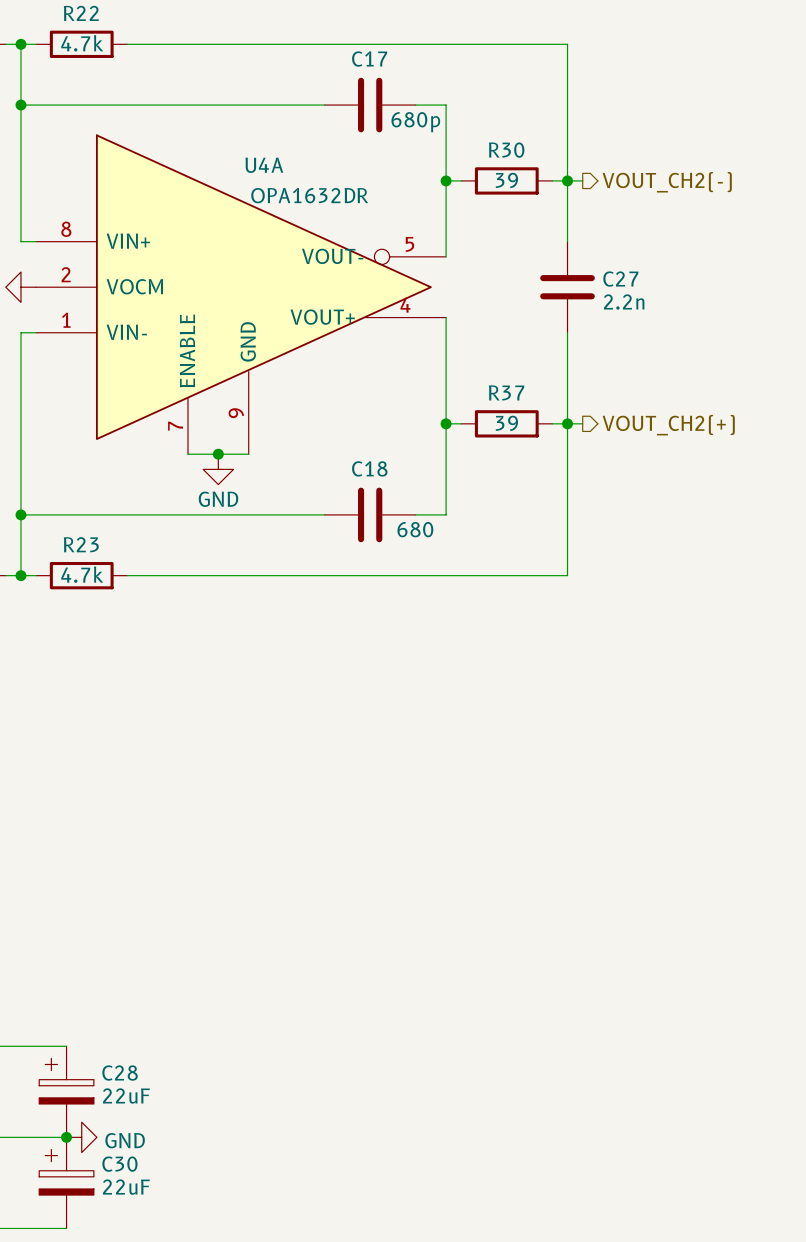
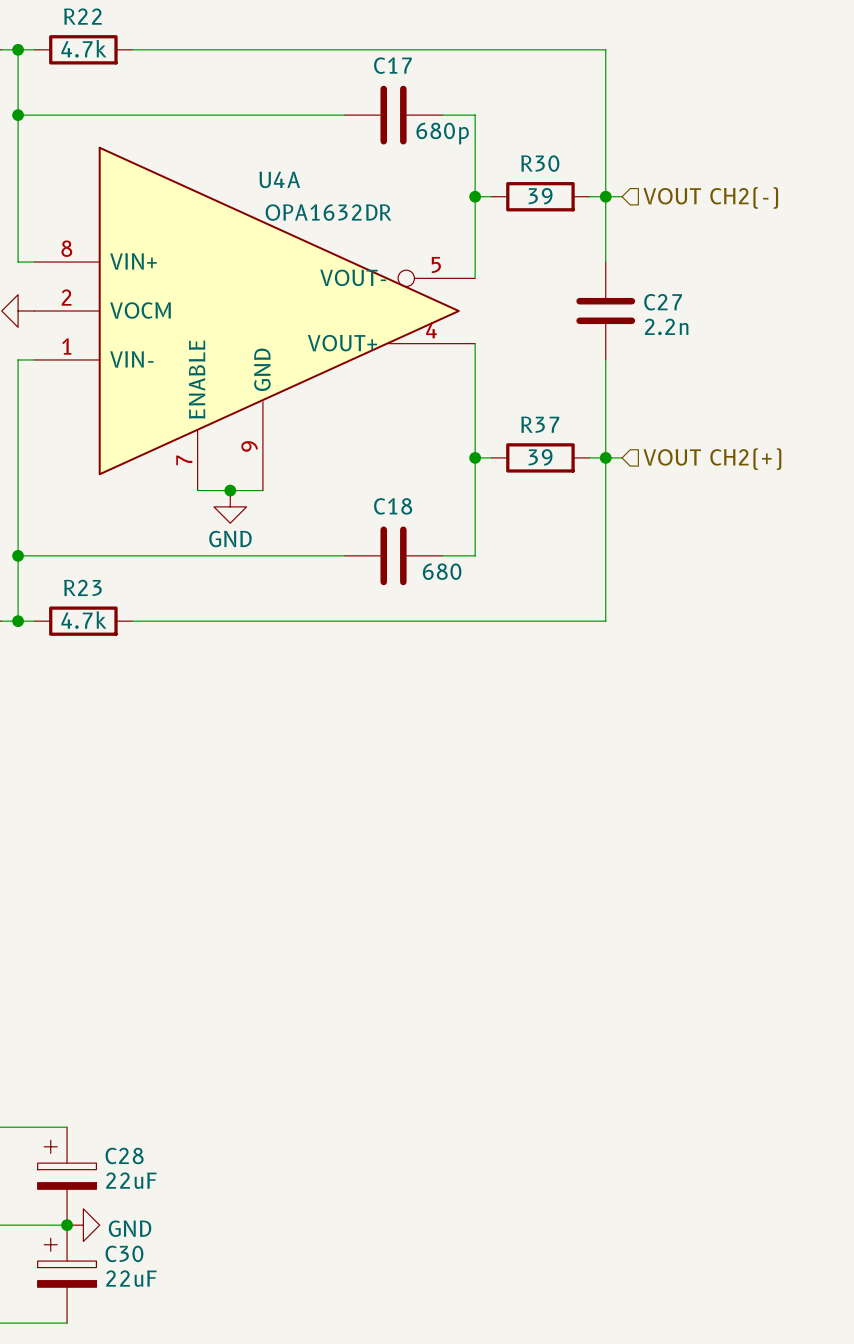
hierarchical label shape: output (667, 182) -> input (710, 197)
hierarchical label: VOUT_CH2(-) (667, 182) -> VOUT CH2(-) (710, 197)
hierarchical label shape: output (668, 425) -> input (712, 459)
hierarchical label: VOUT_CH2(+) (668, 425) -> VOUT CH2(+) (712, 459)

